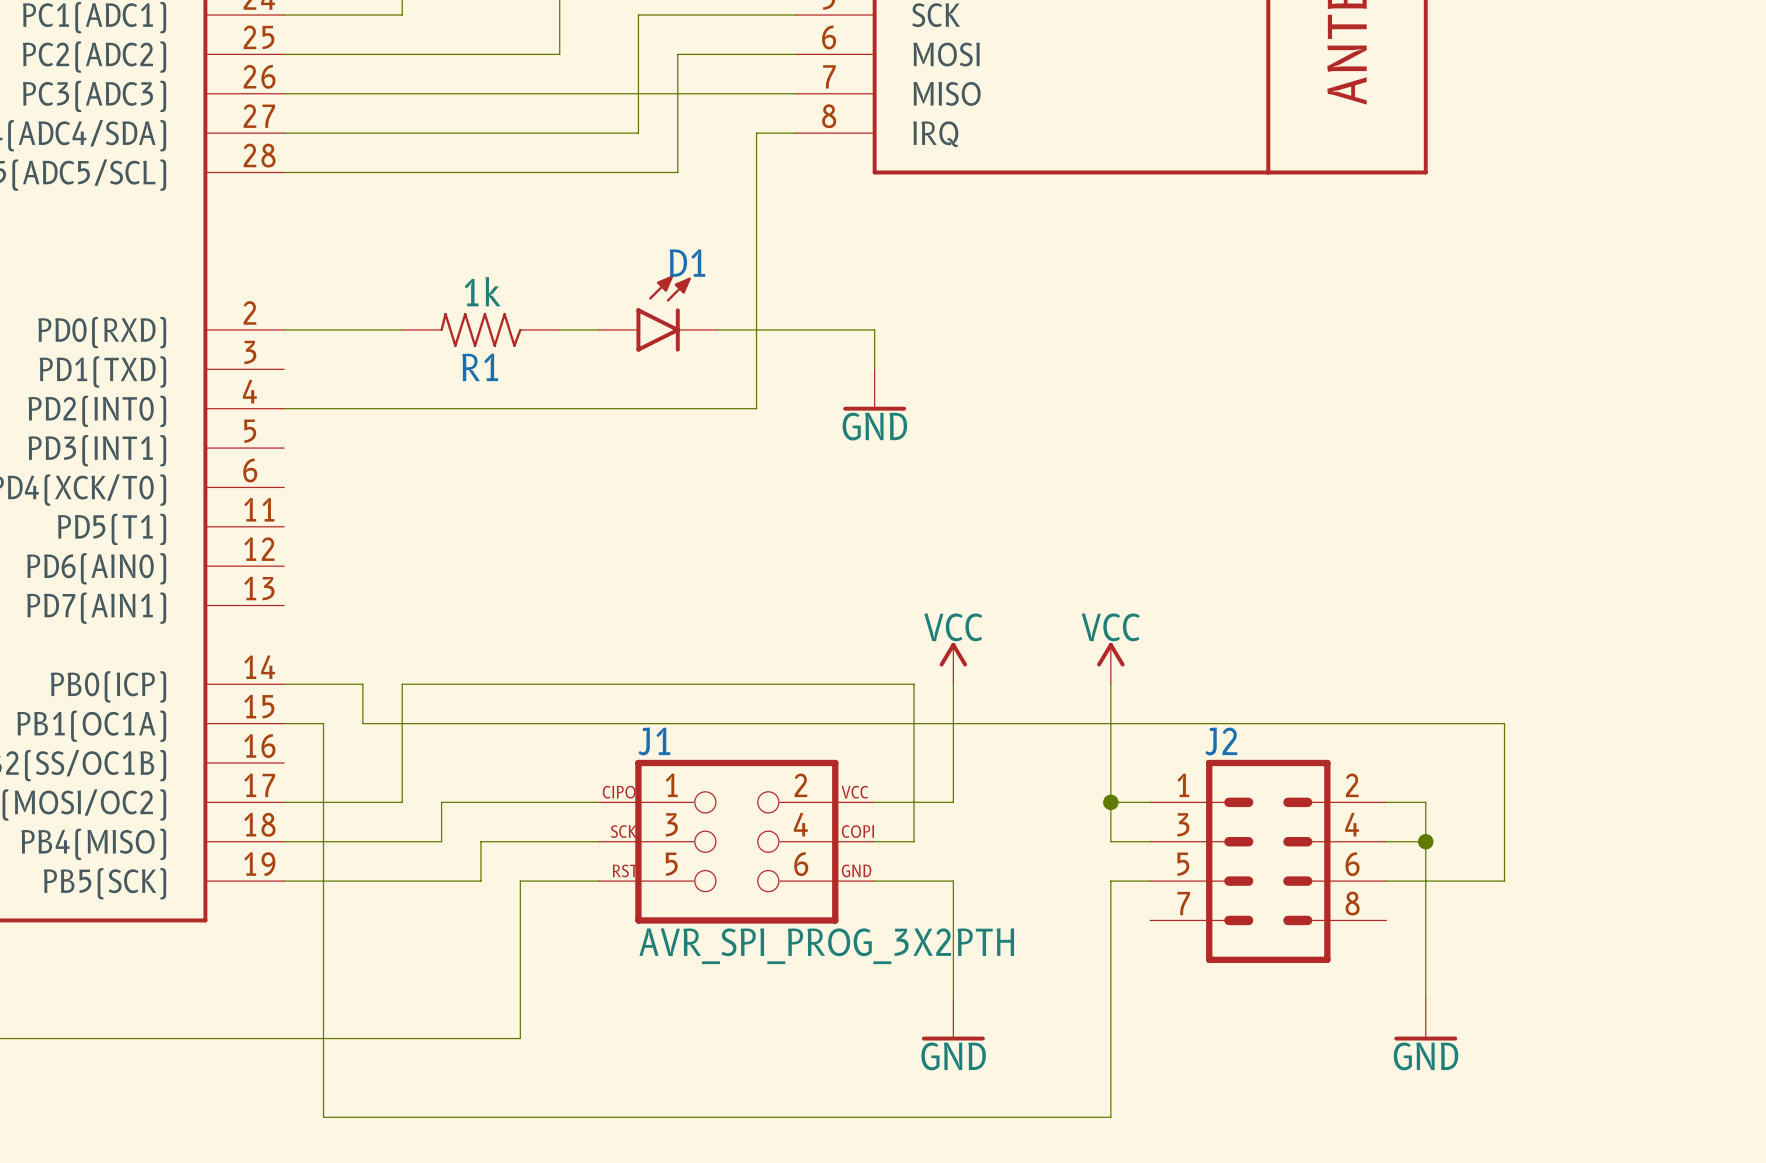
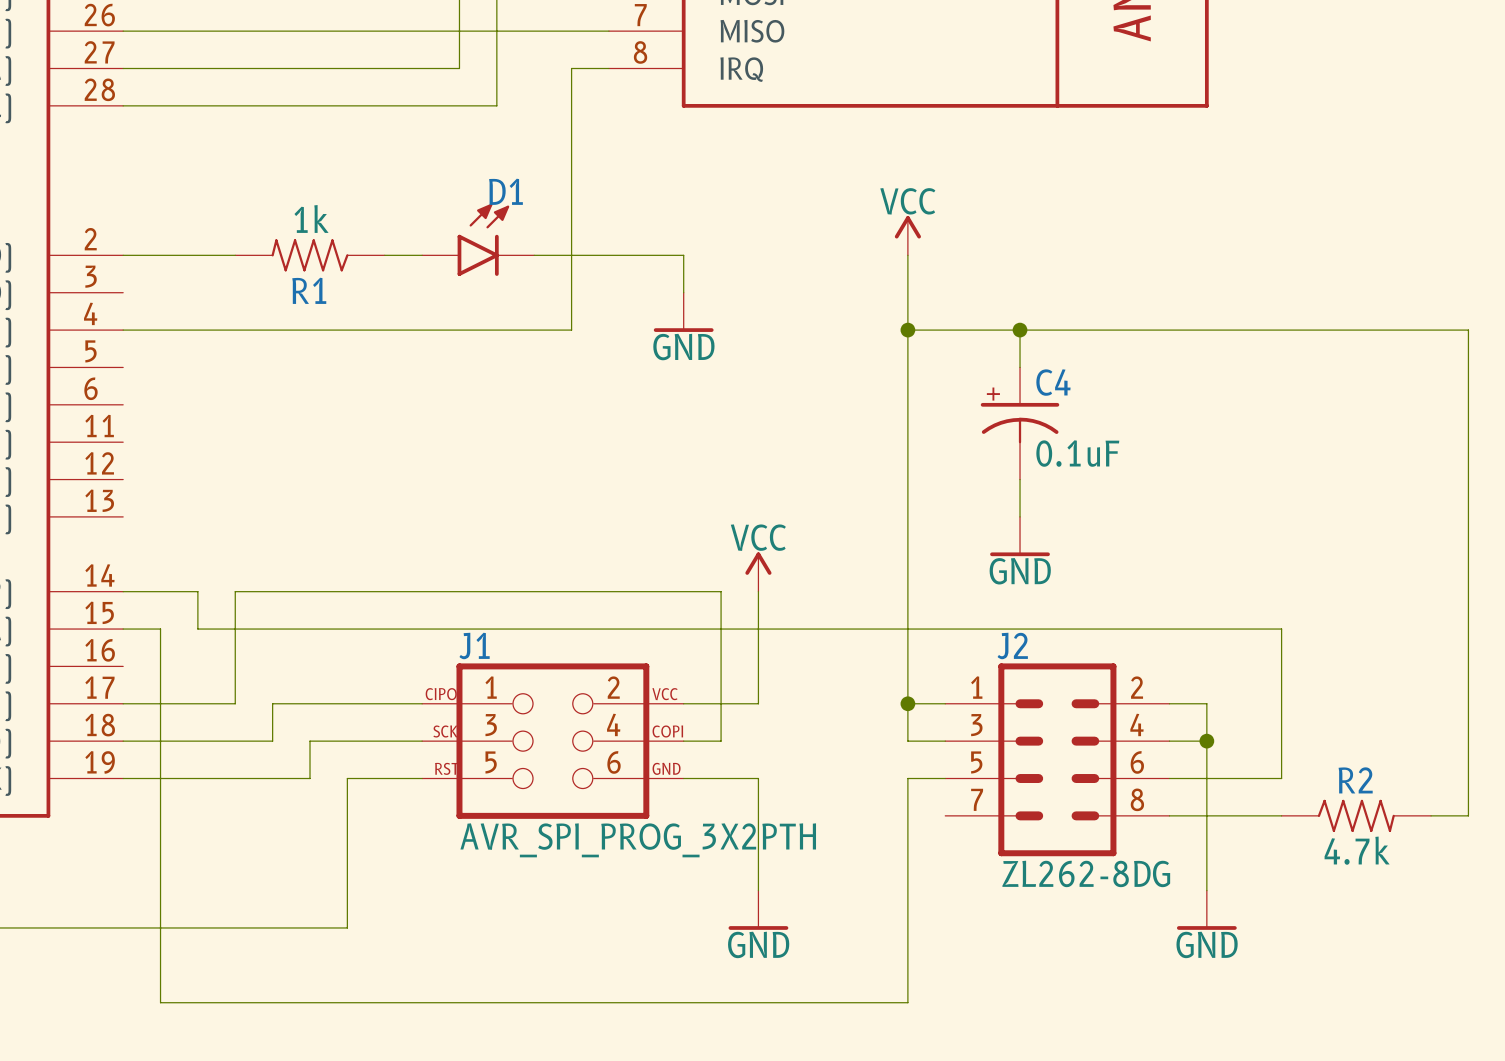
wire: none -> (907, 255) (907, 591)
wire: none -> (907, 330) (1468, 330) (1468, 815) (1431, 815)
junction: none -> (907, 330)
wire: none -> (1020, 330) (1020, 367)
junction: none -> (1020, 330)
C4: none -> 0.1uF (1020, 423)
wire: none -> (1020, 479) (1020, 516)
power symbol: none -> GND (1020, 536)
power symbol position: VCC (1110, 663) -> VCC (907, 235)
wire: none -> (1169, 815) (1281, 815)
R2: none -> 4.7k (1356, 815)
J2 value: none -> ZL262-8DG (1086, 873)

